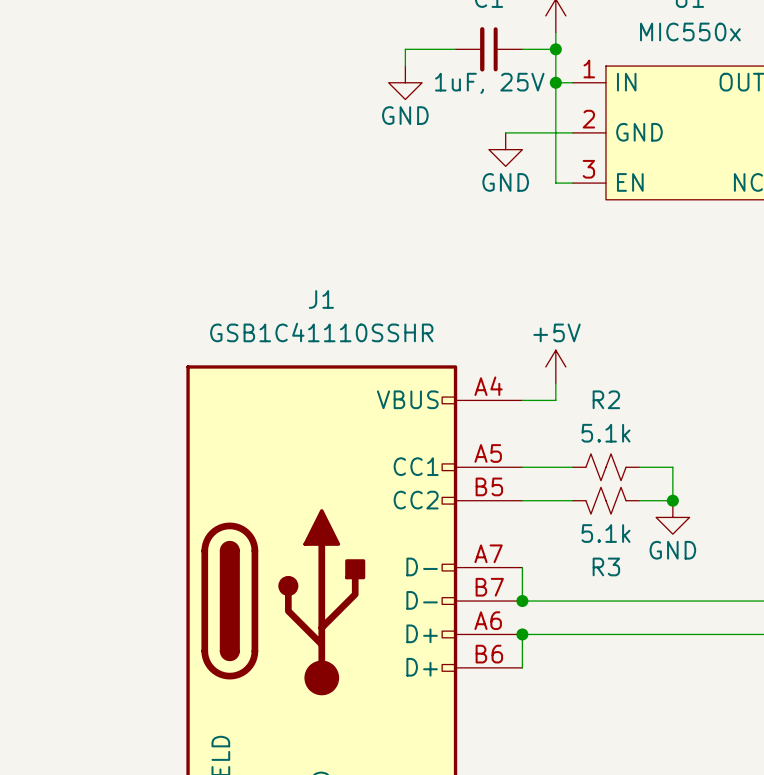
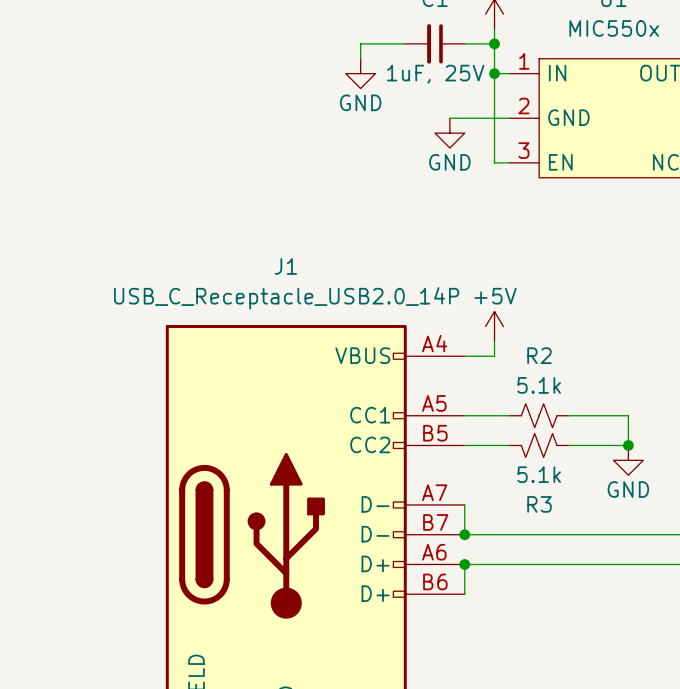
J1 value: GSB1C41110SSHR (321, 332) -> USB_C_Receptacle_USB2.0_14P (286, 298)
wire: (672, 467) (672, 500) -> (598, 415) (628, 415) (628, 445) (598, 445)
junction position: (672, 500) -> (628, 445)
power symbol position: GND (672, 517) -> GND (628, 460)

